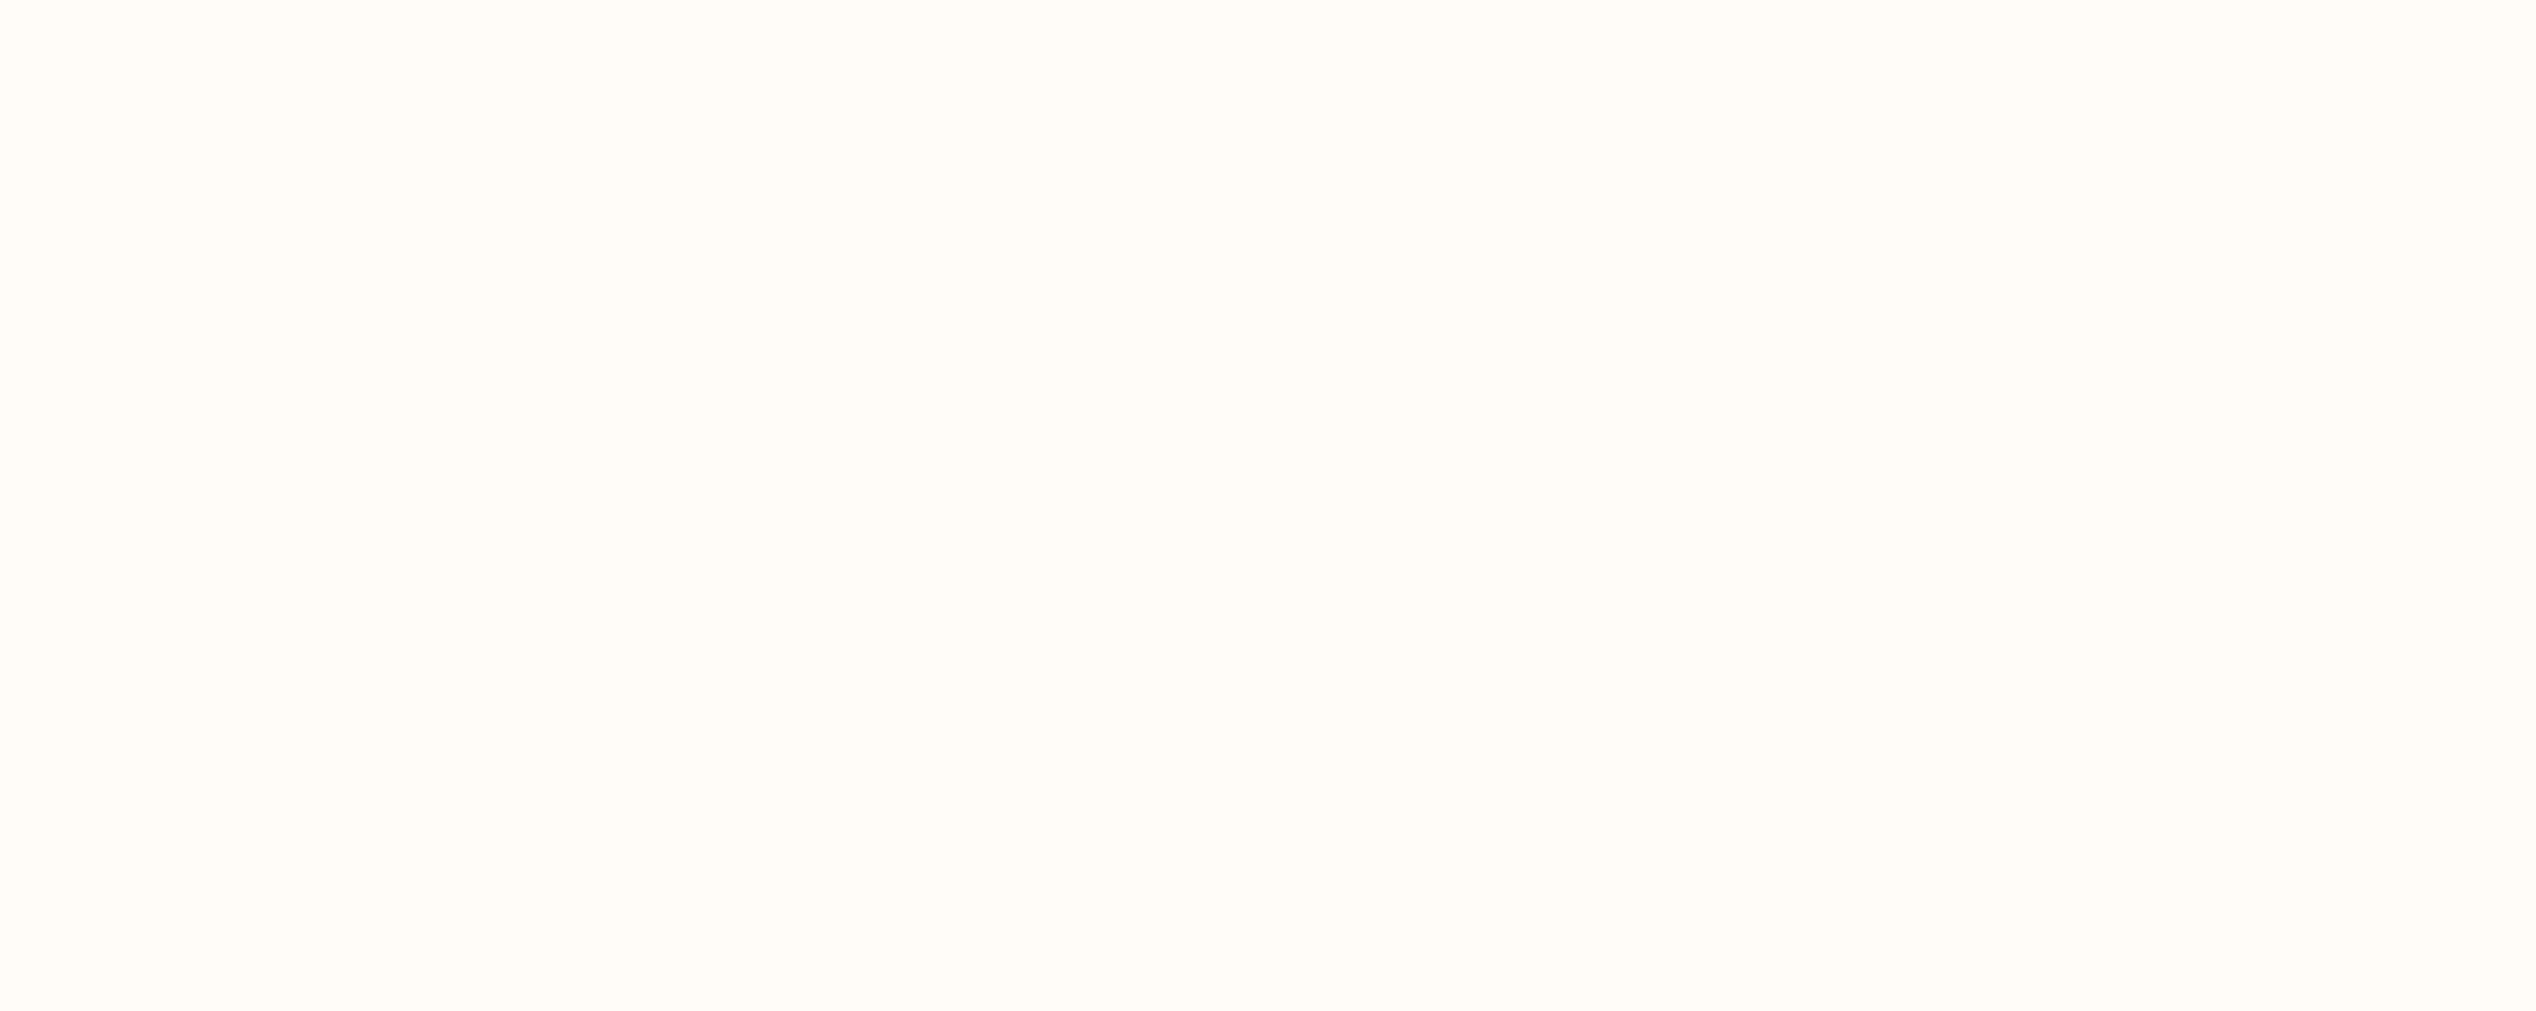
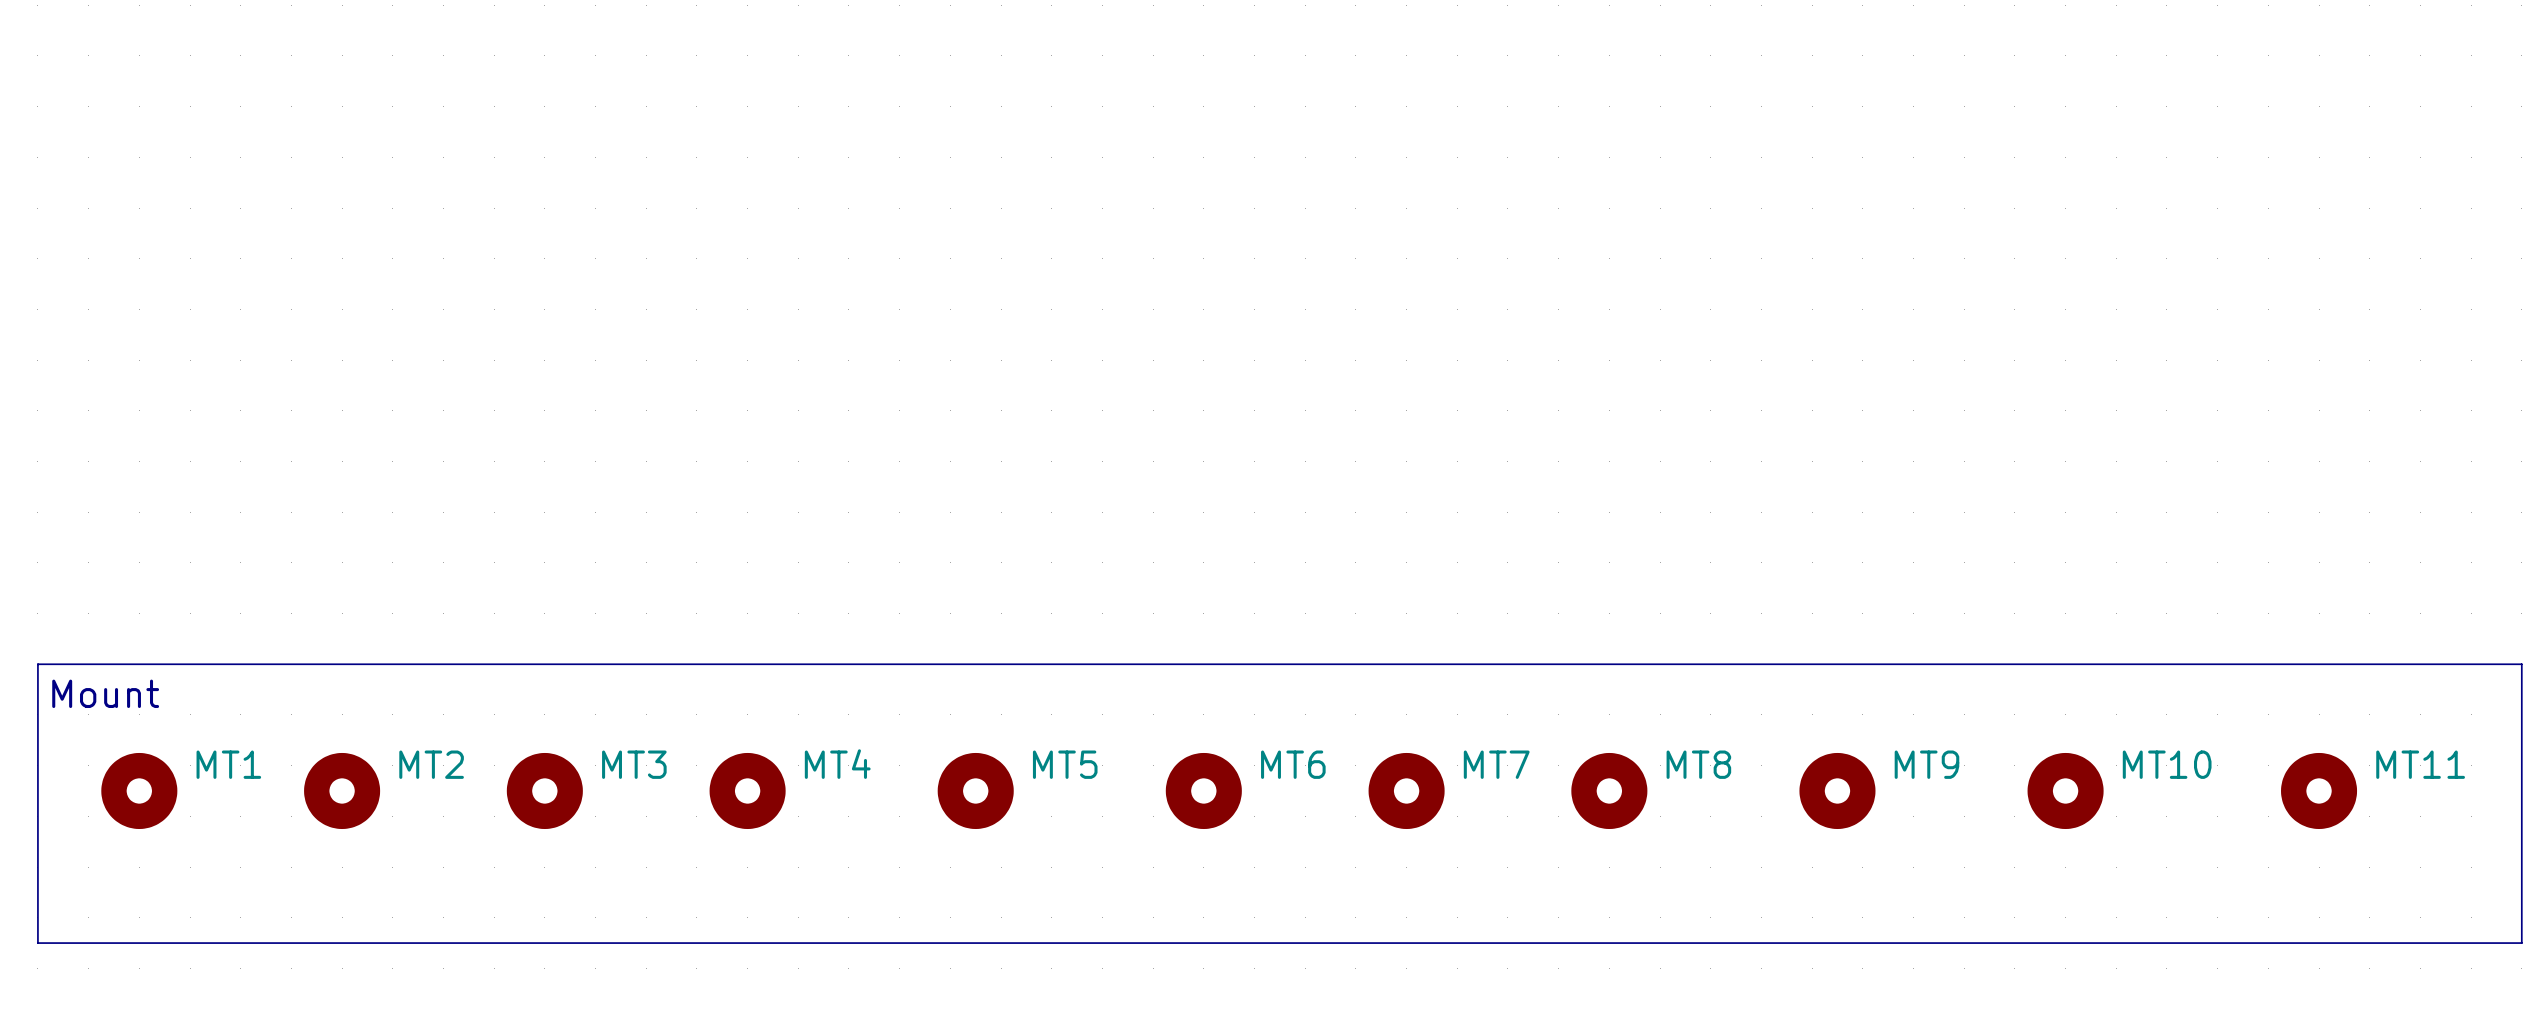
line: none -> (37, 664) (2521, 664) (2521, 943) (37, 943) (37, 664)
text: none -> Mount (105, 693)
MT1: none -> (139, 790)
MT2: none -> (342, 790)
MT3: none -> (544, 790)
MT4: none -> (747, 790)
MT5: none -> (975, 790)
MT6: none -> (1203, 790)
MT7: none -> (1406, 790)
MT8: none -> (1609, 790)
MT9: none -> (1837, 790)
MT10: none -> (2065, 790)
MT11: none -> (2319, 790)

